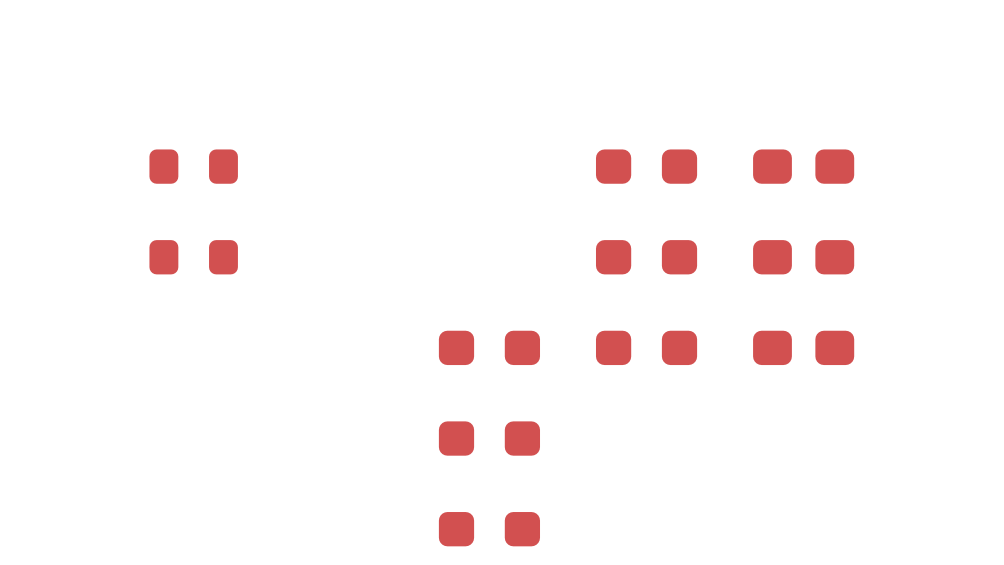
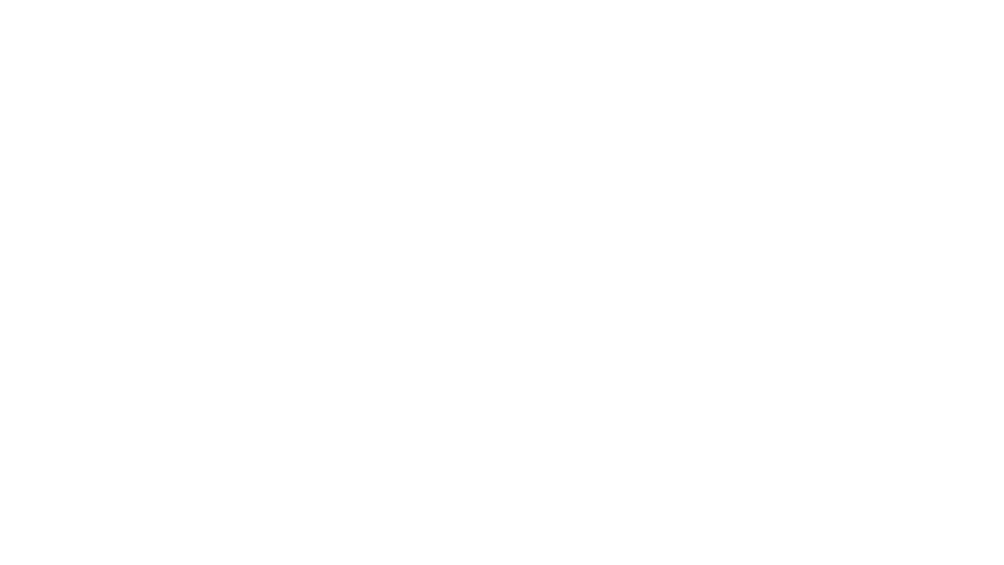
part: (193, 166) -> none
part: (646, 166) -> none
part: (803, 166) -> none
part: (193, 257) -> none
part: (646, 257) -> none
part: (803, 257) -> none
part: (489, 347) -> none
part: (646, 347) -> none
part: (803, 347) -> none
part: (489, 438) -> none
part: (489, 529) -> none

